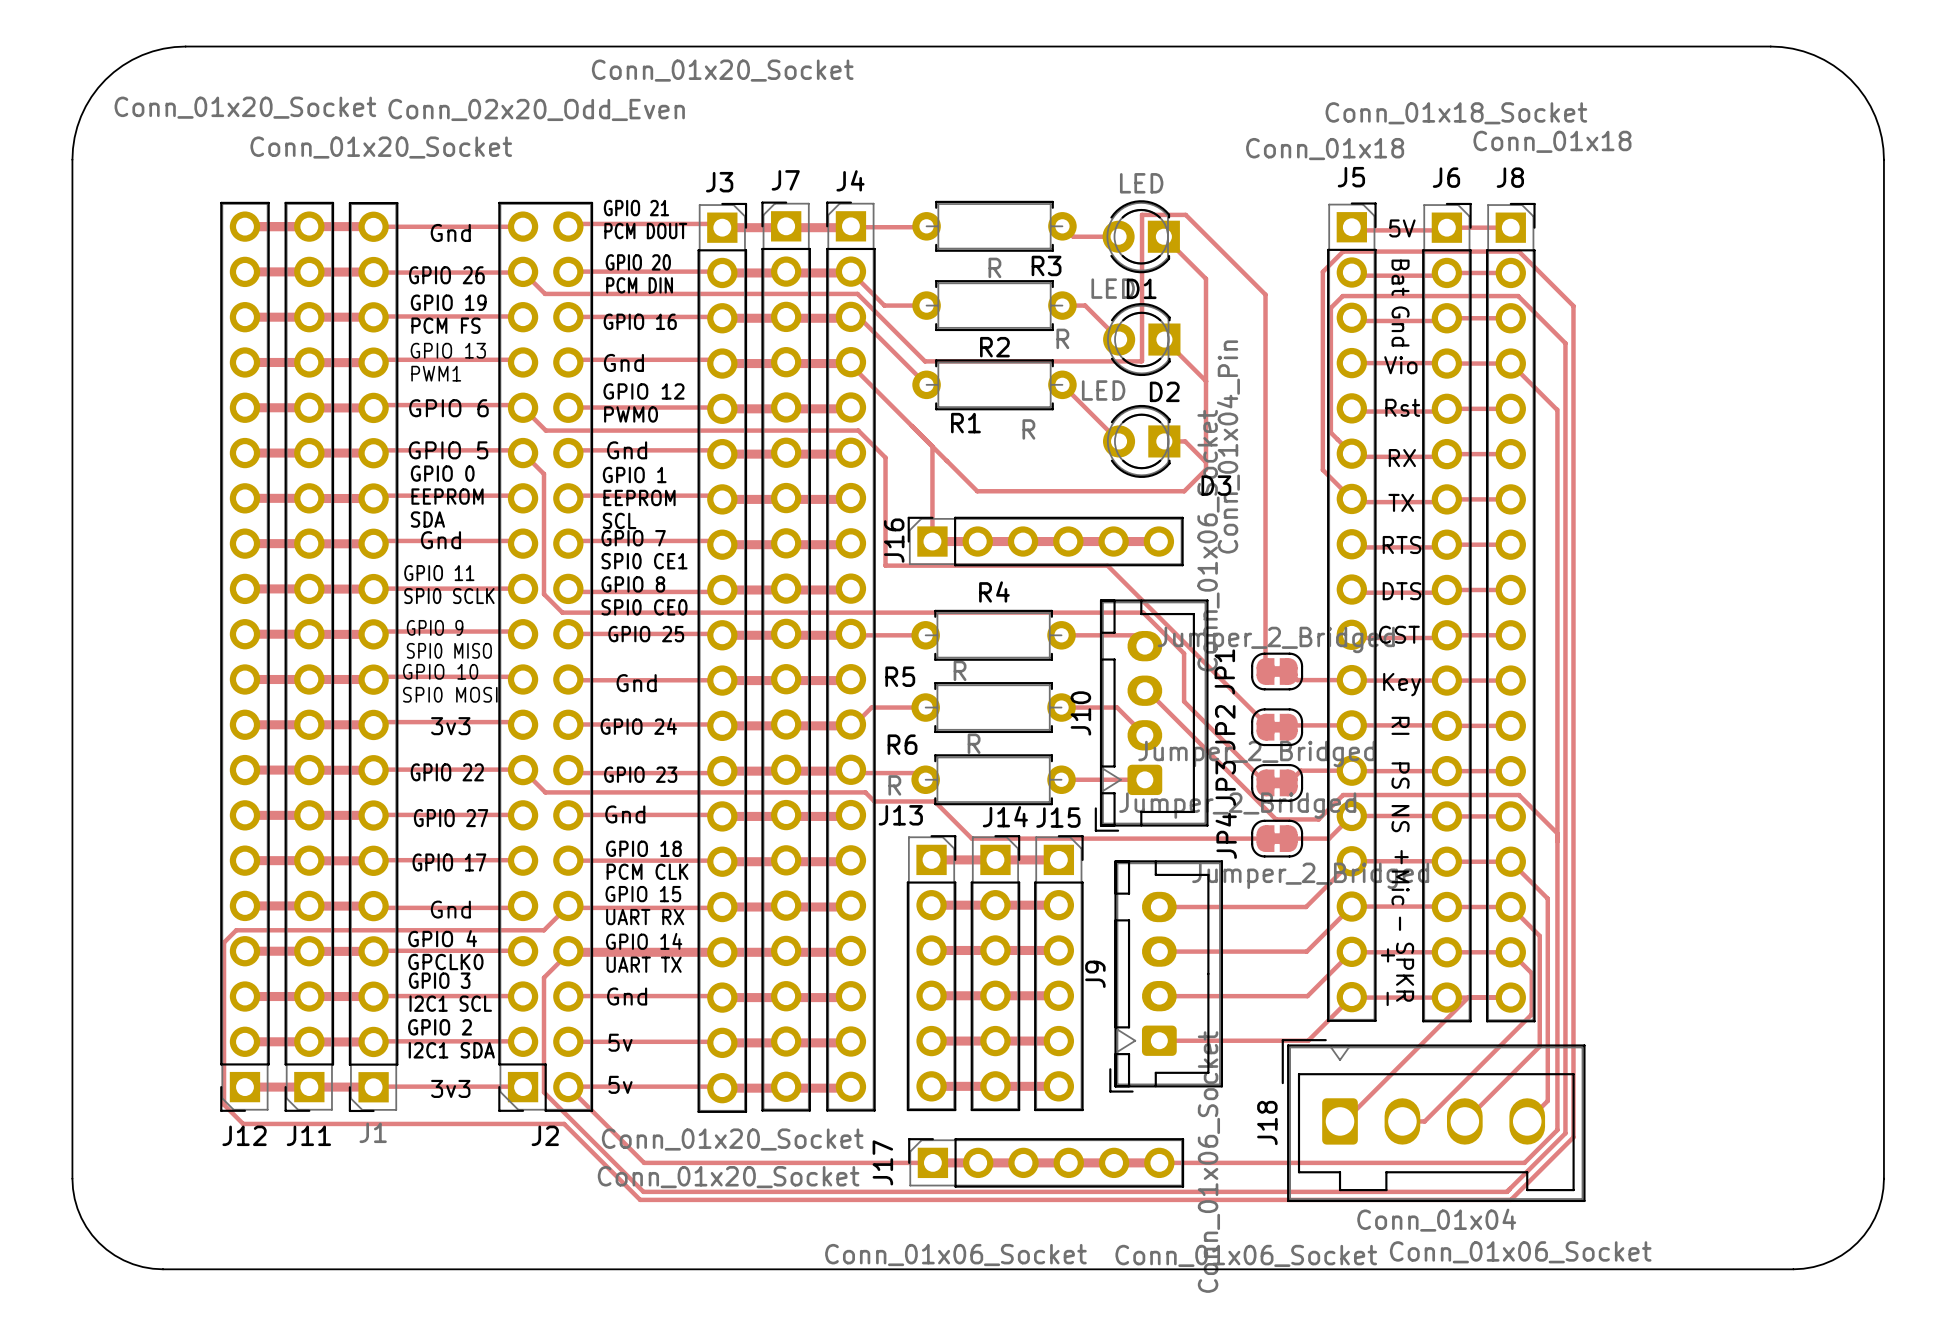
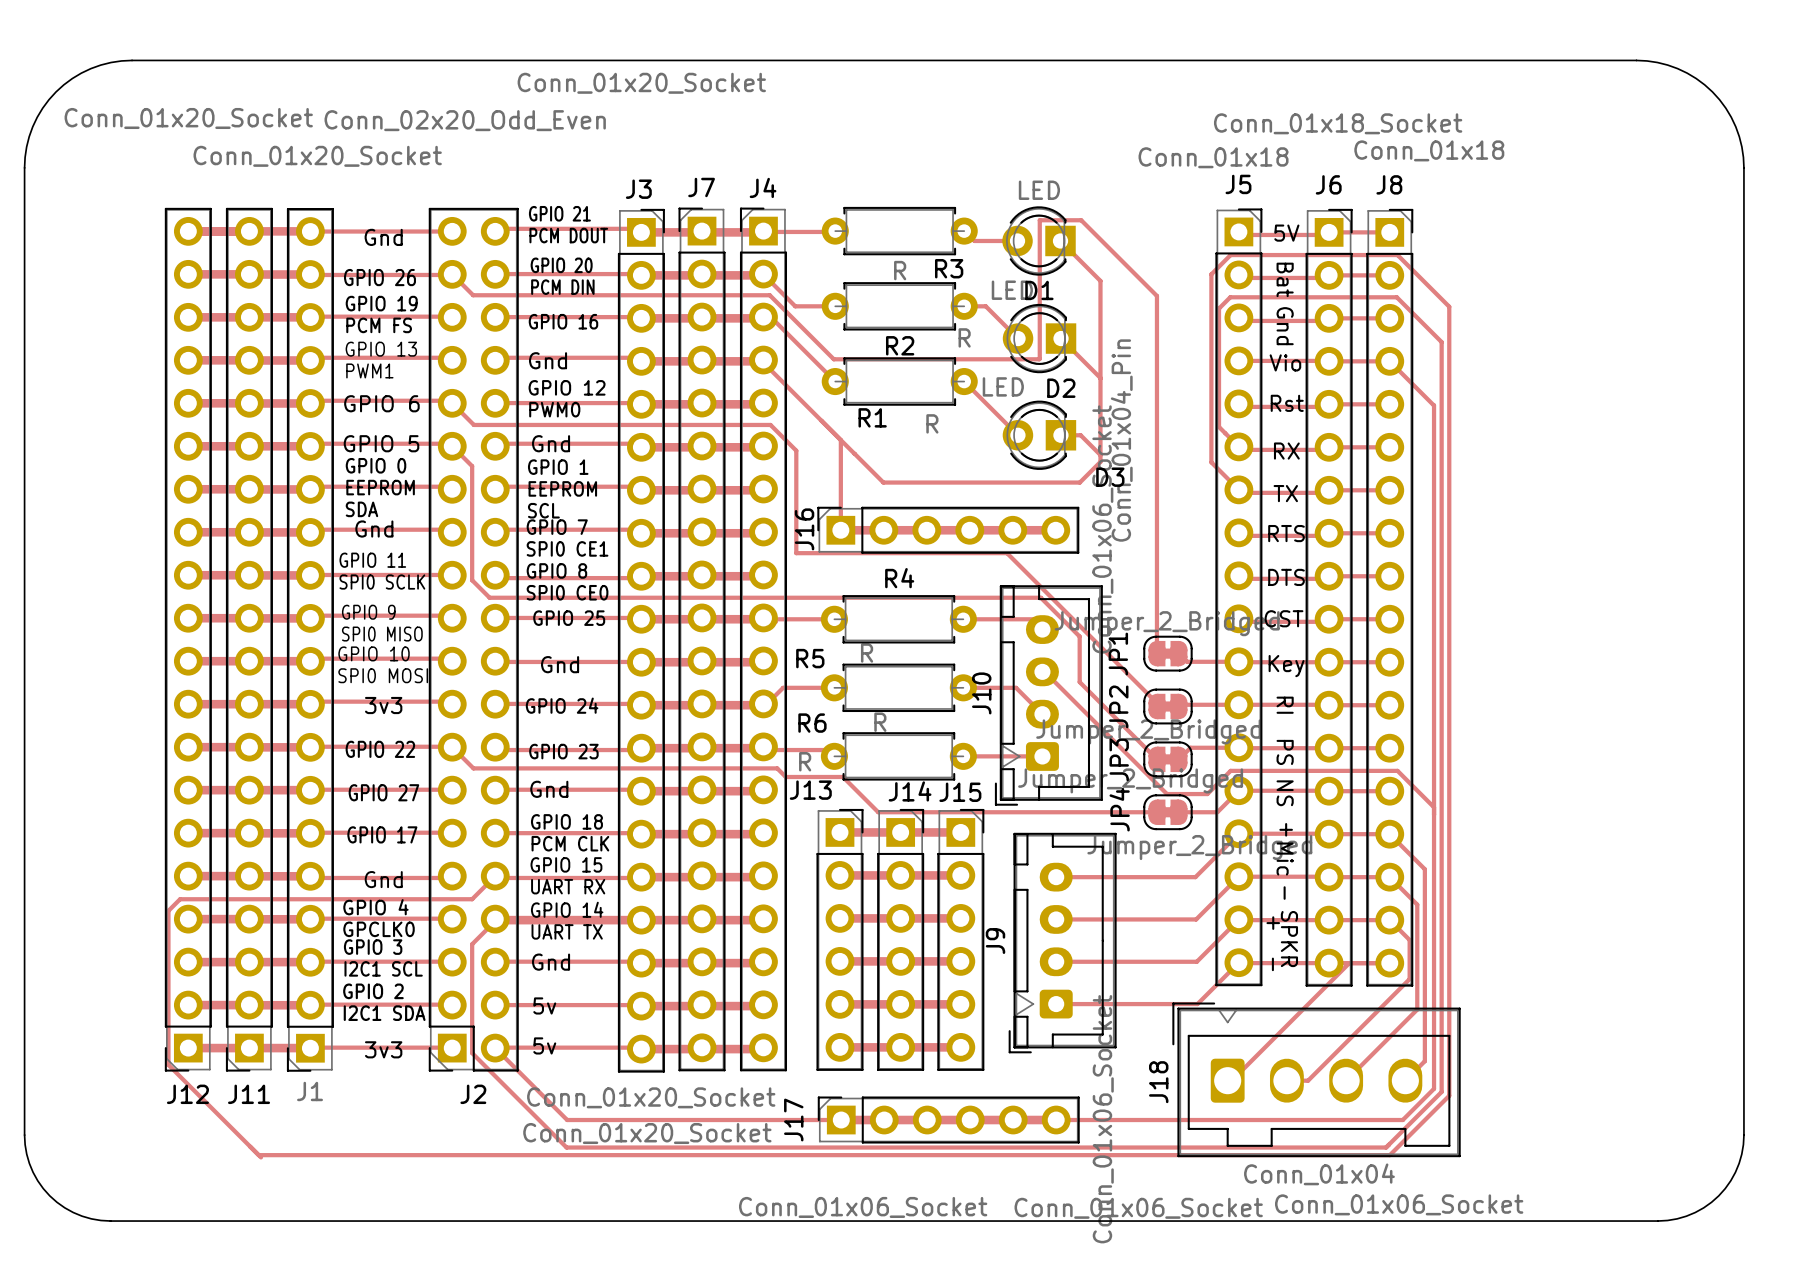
track: (243, 1123) (564, 1123) (640, 1199) -> (258, 1155) (563, 1155)
track: none -> (186, 1083) (260, 1157)

